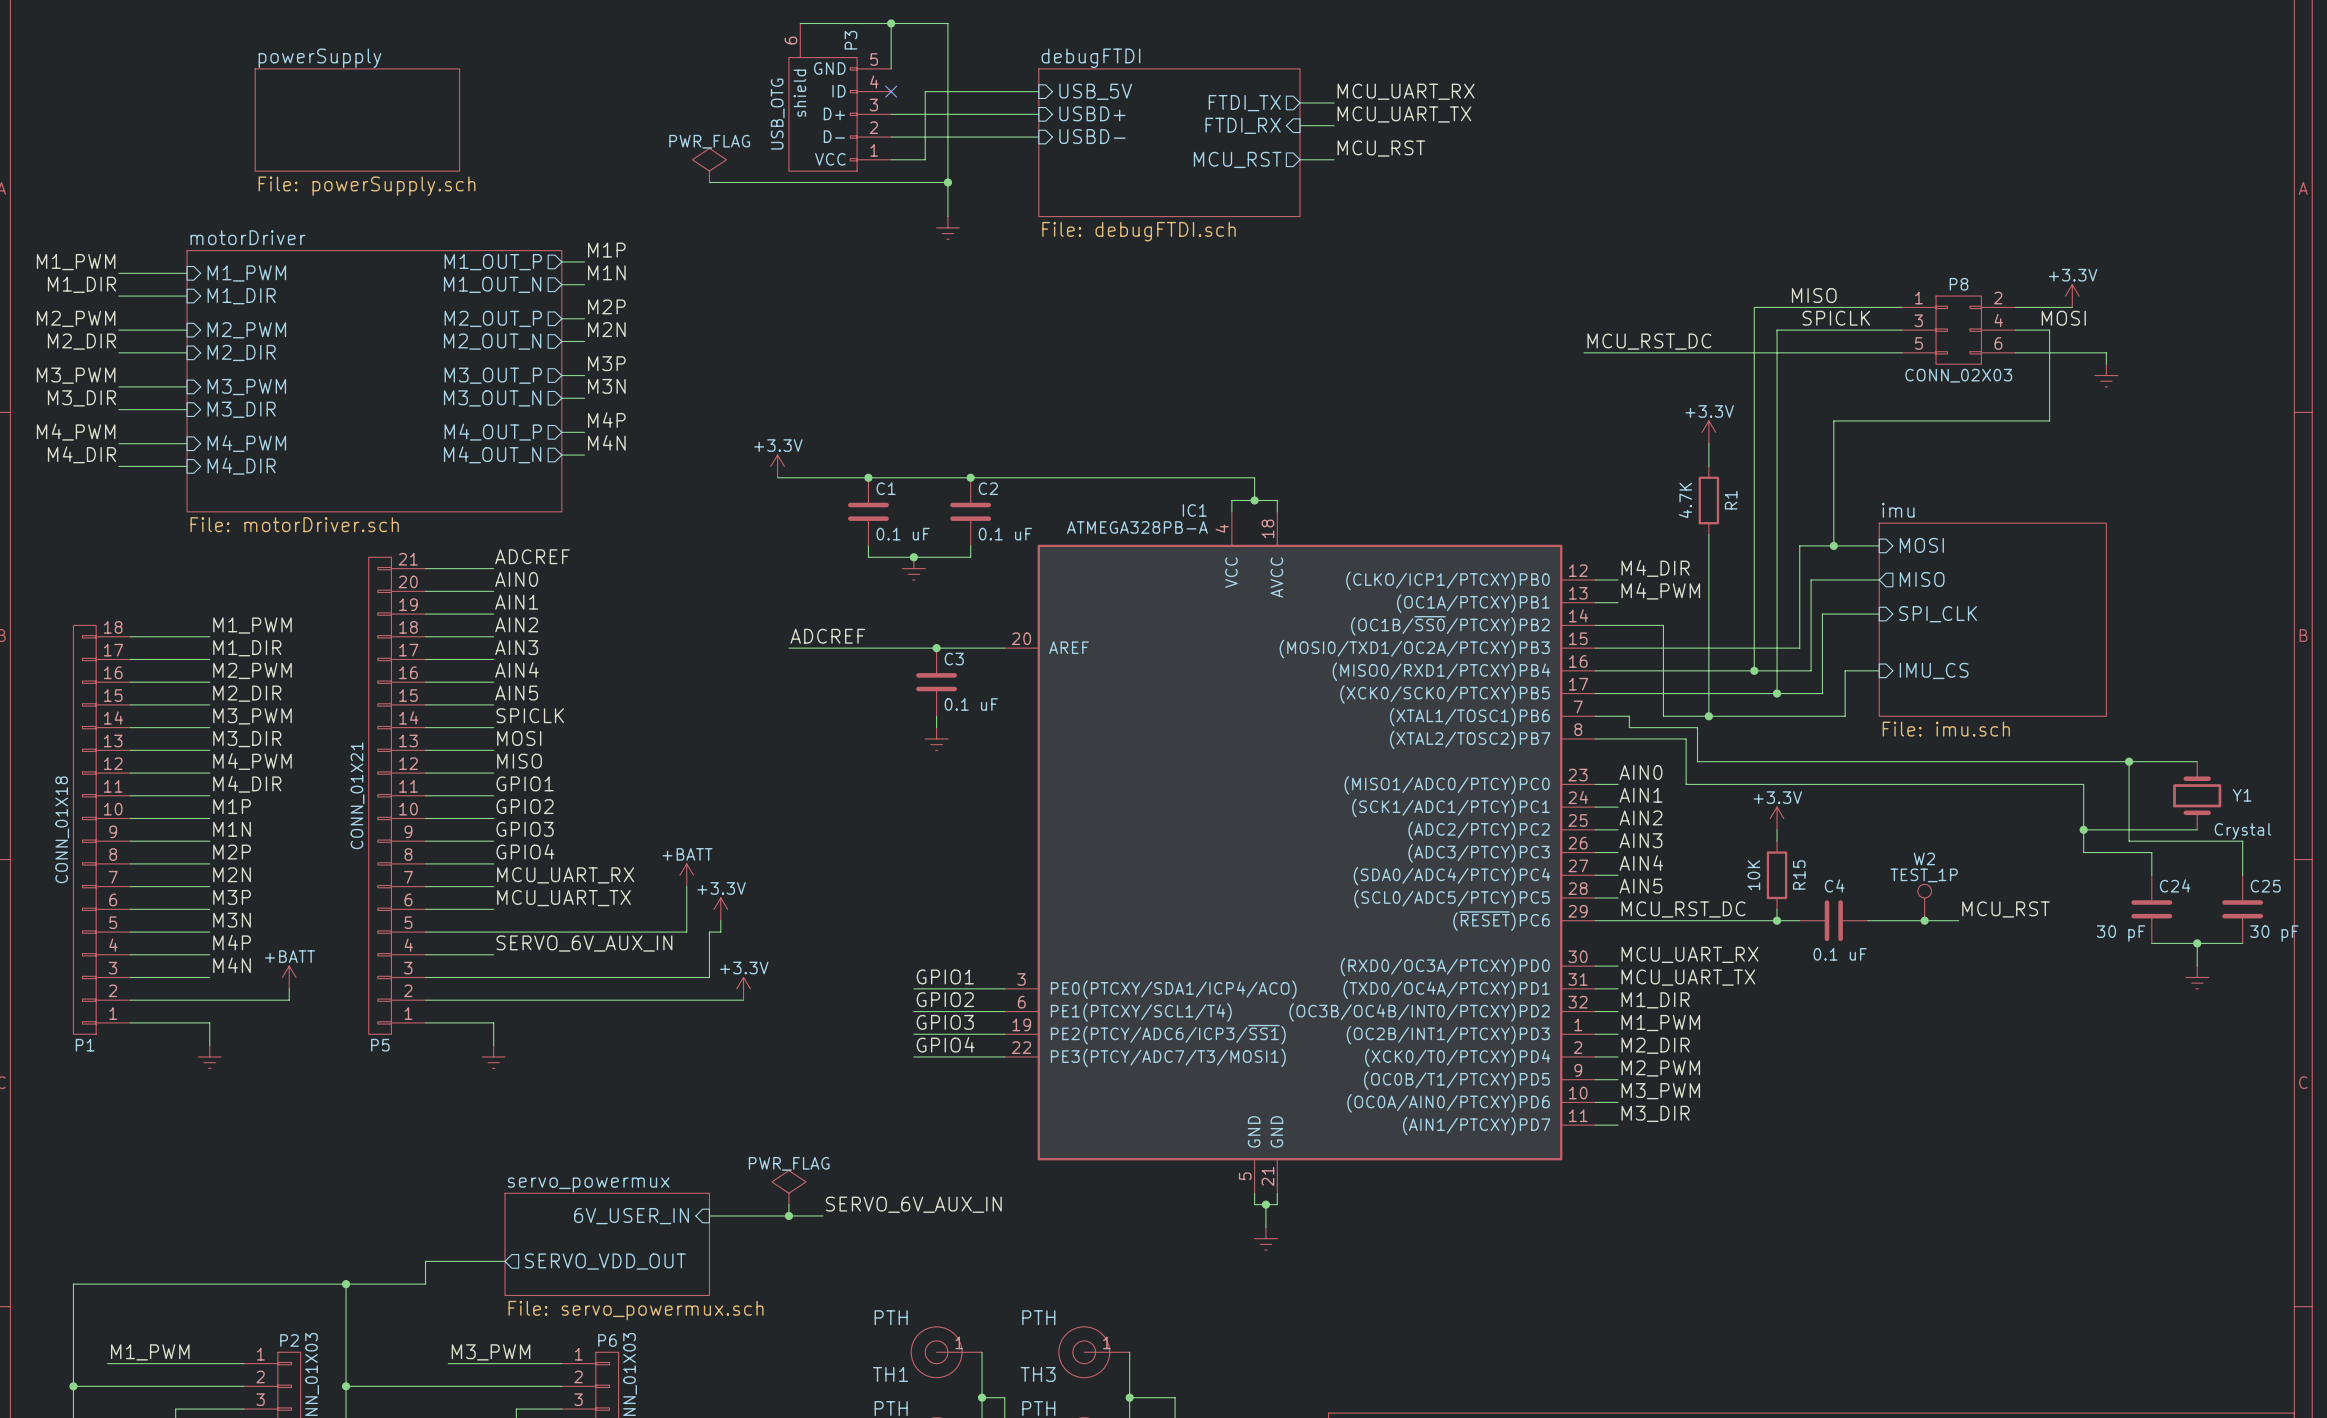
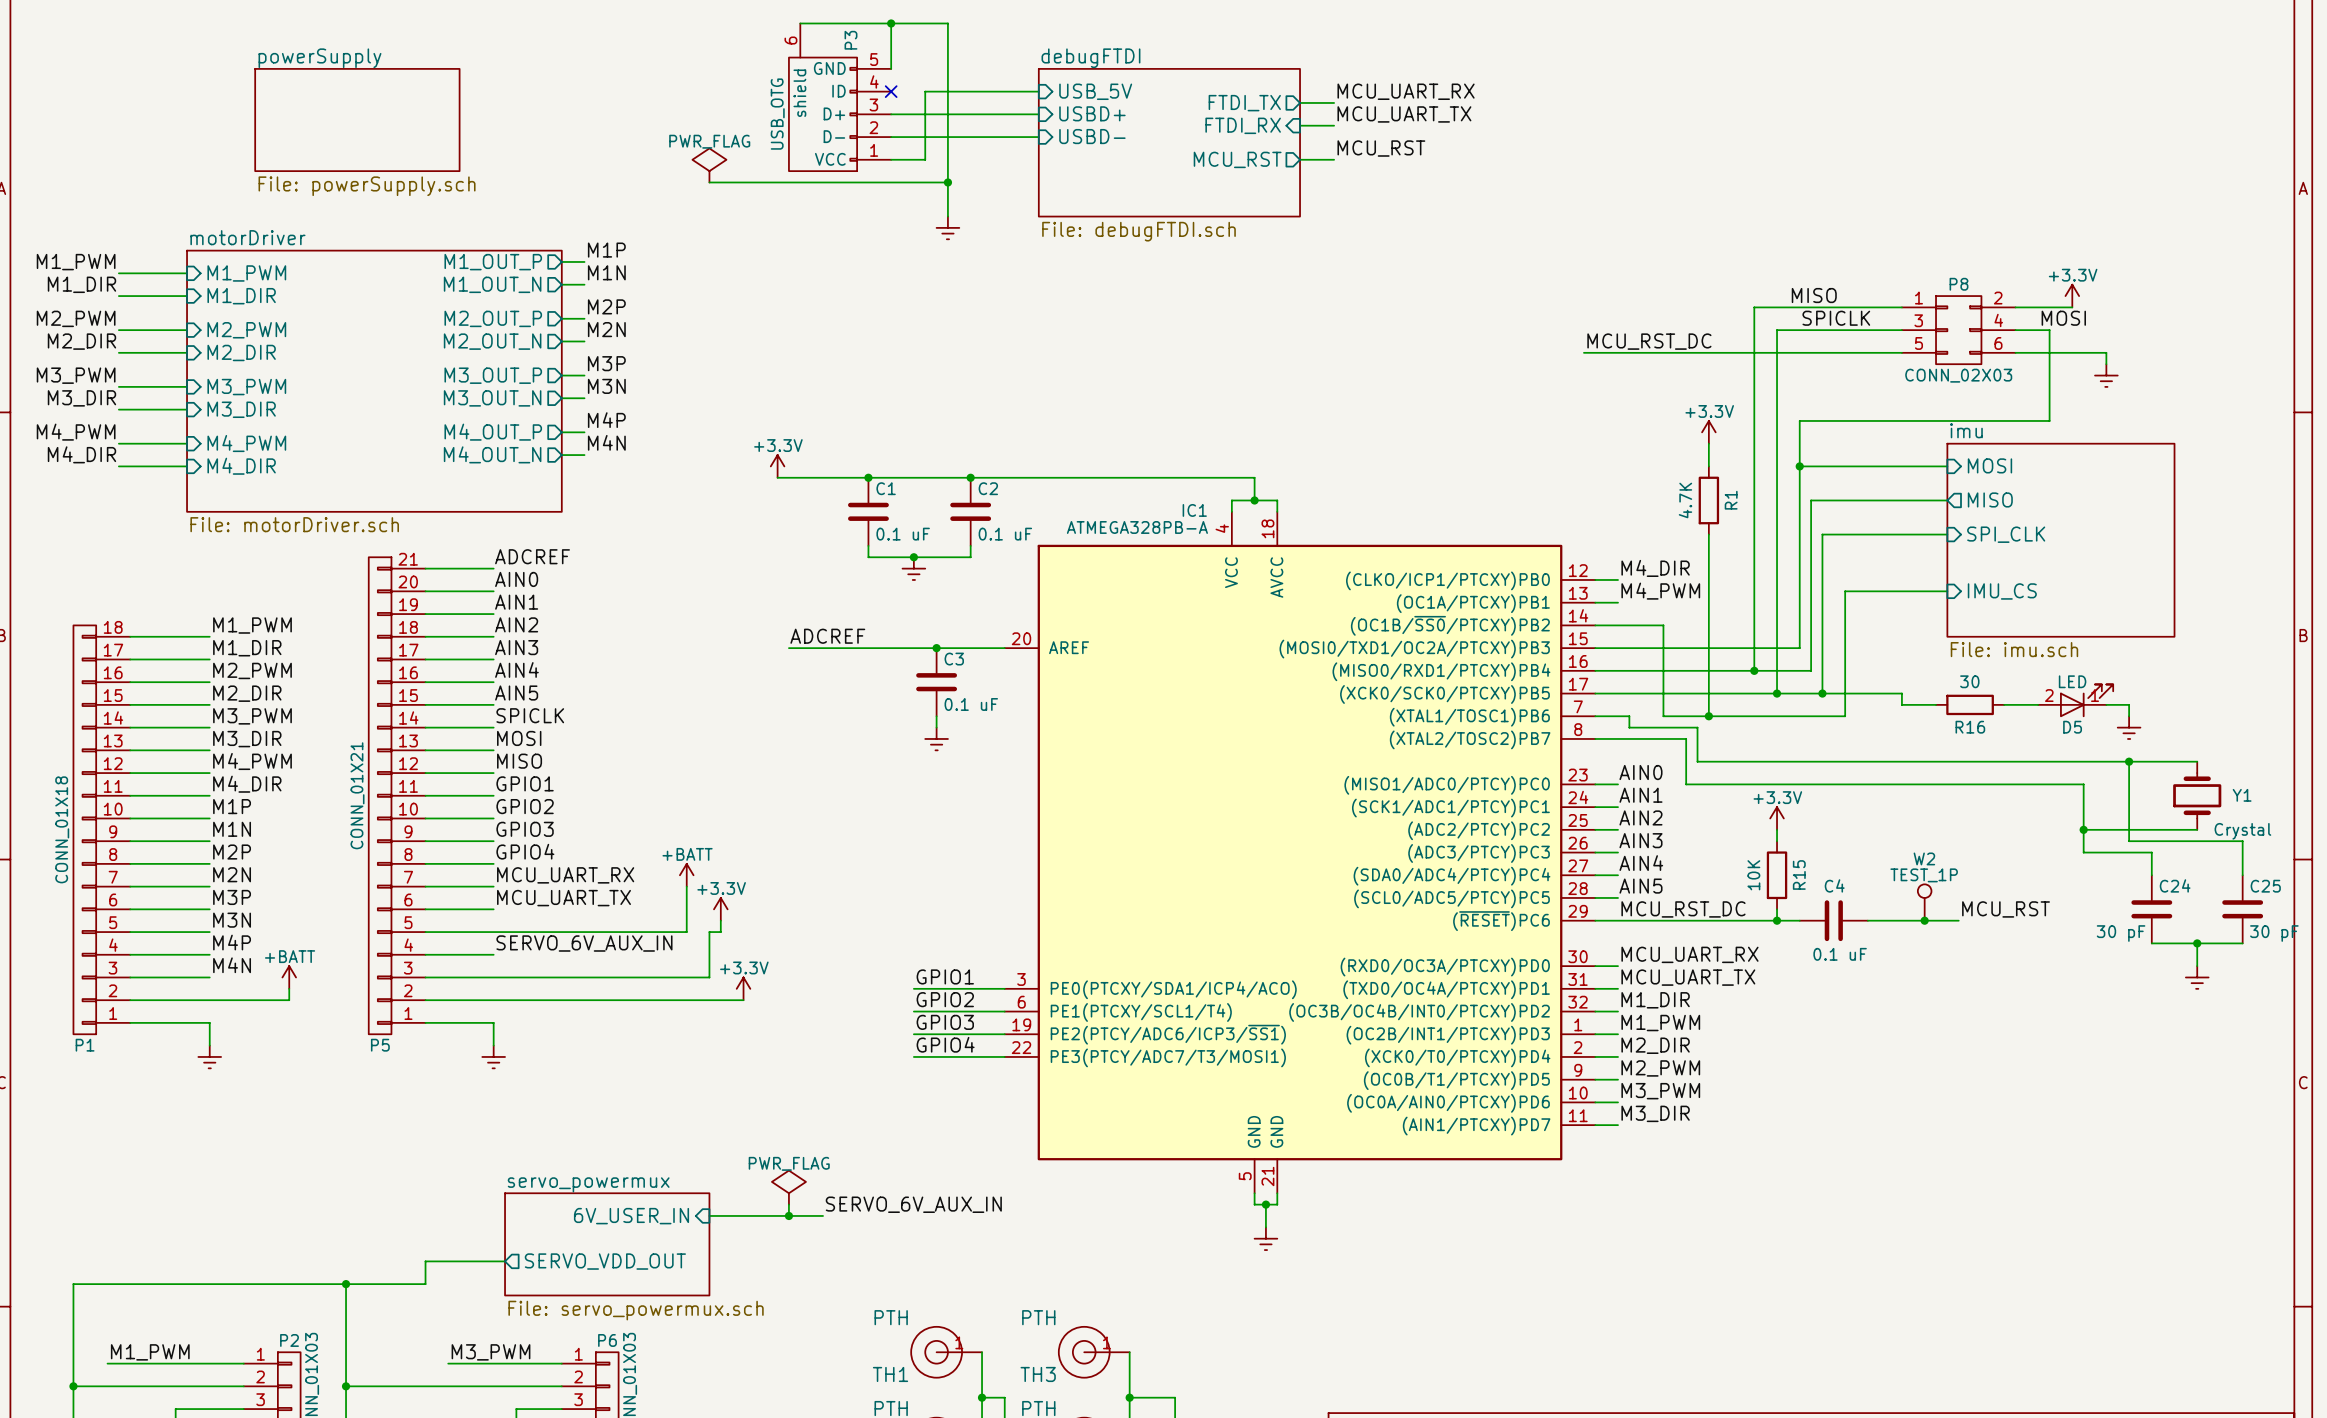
wire: (1833, 420) (1833, 545) -> (1833, 420) (1799, 420) (1799, 545)
wire: none -> (1799, 466) (1947, 466)
junction: none -> (1799, 466)
wire: (1799, 545) (1879, 545) -> none
junction: (1833, 545) -> none
sheet pin position: MOSI (1921, 545) -> MOSI (1989, 465)
wire: (1811, 579) (1879, 579) -> (1811, 579) (1811, 500) (1947, 500)
sheet pin position: MISO (1922, 579) -> MISO (1990, 499)
wire: (1822, 614) (1879, 614) -> (1822, 614) (1822, 534) (1947, 534)
sheet pin position: SPI_CLK (1938, 614) -> SPI_CLK (2006, 534)
sheet imu position: (1992, 619) -> (2060, 540)
wire: (1845, 670) (1879, 670) -> (1845, 670) (1845, 591) (1947, 591)
sheet pin position: IMU_CS (1934, 670) -> IMU_CS (2002, 591)
wire: none -> (1822, 693) (1901, 693) (1901, 704) (1936, 704)
junction: none -> (1822, 693)
D5: none -> LED (2075, 700)
R16: none -> 30 (1970, 704)
wire: none -> (2004, 704) (2038, 704)
wire: none -> (2106, 704) (2129, 704) (2129, 716)
power symbol: none -> (2129, 727)

